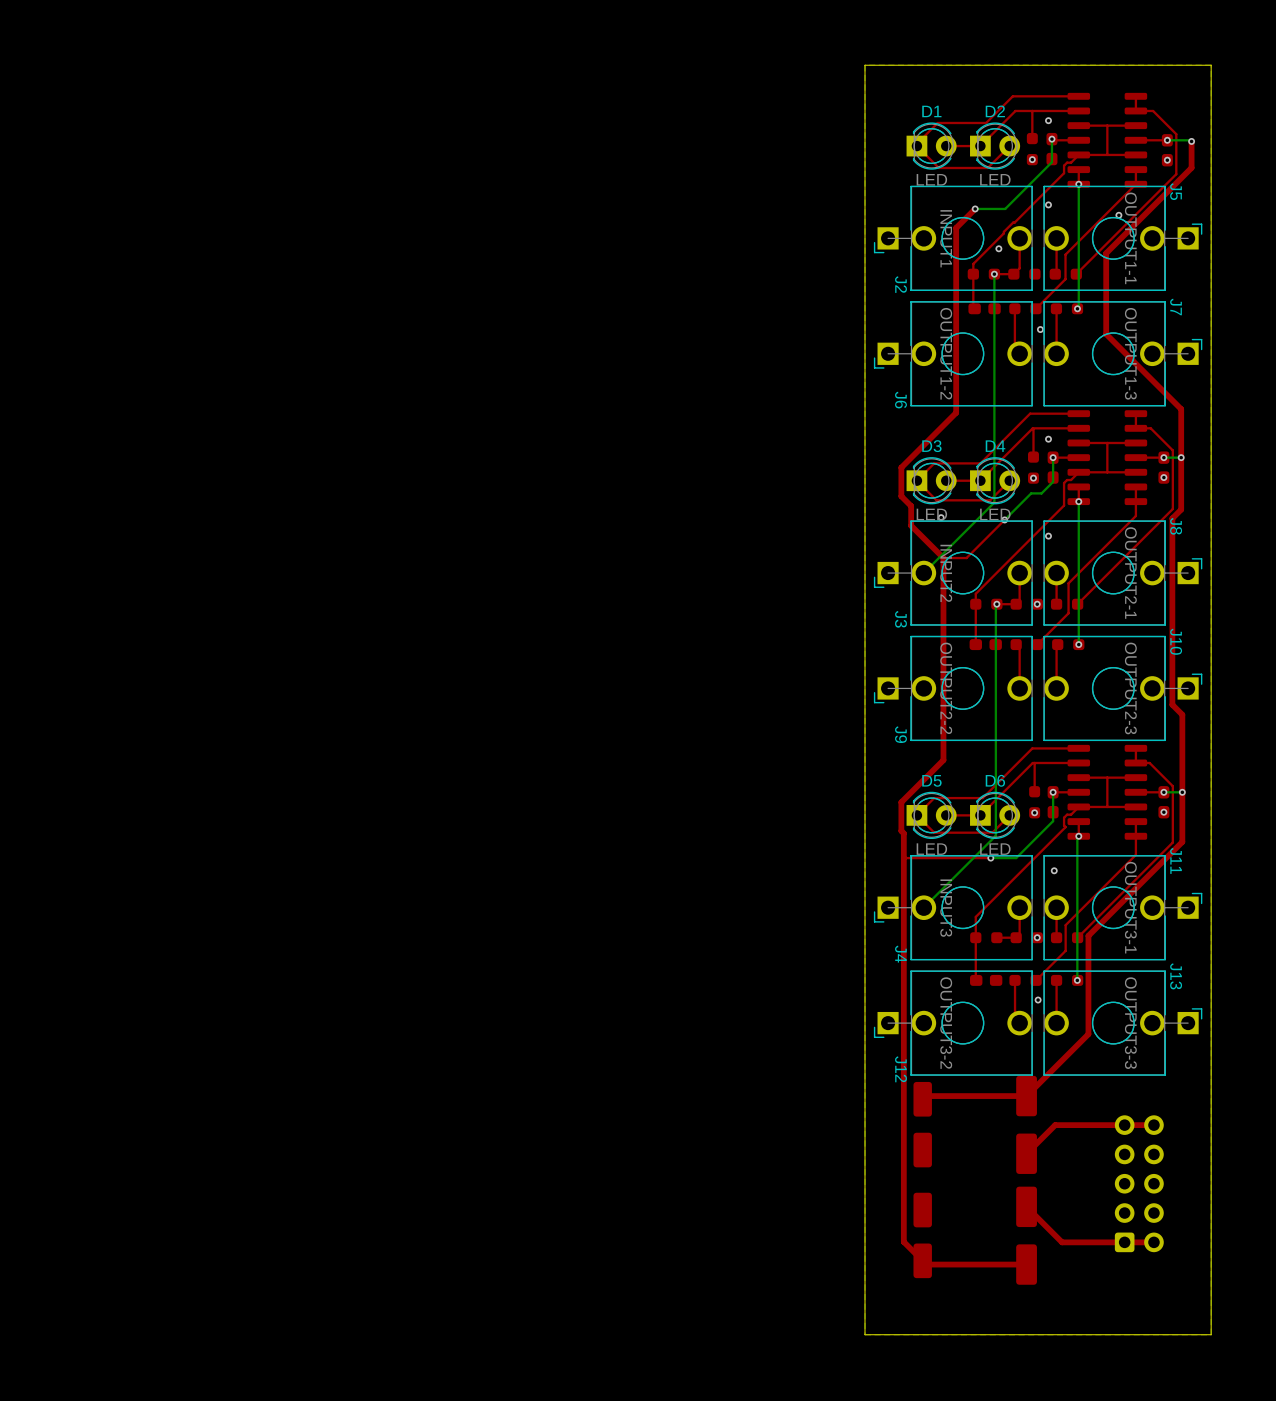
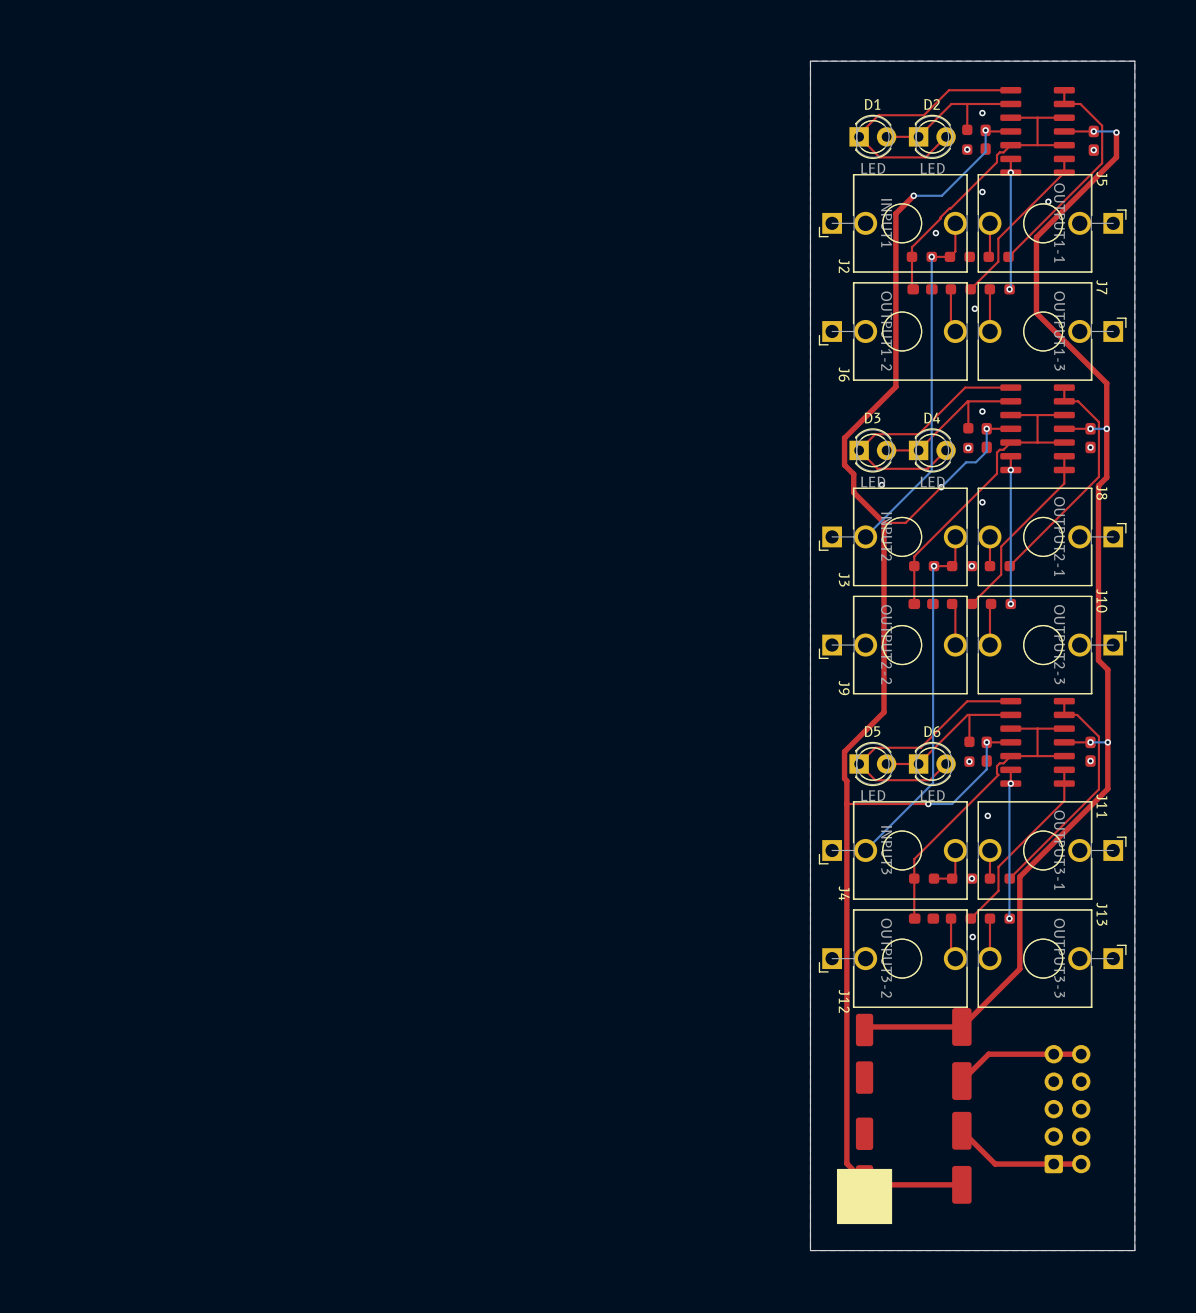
drawing: none -> [836, 1168, 893, 1225]

